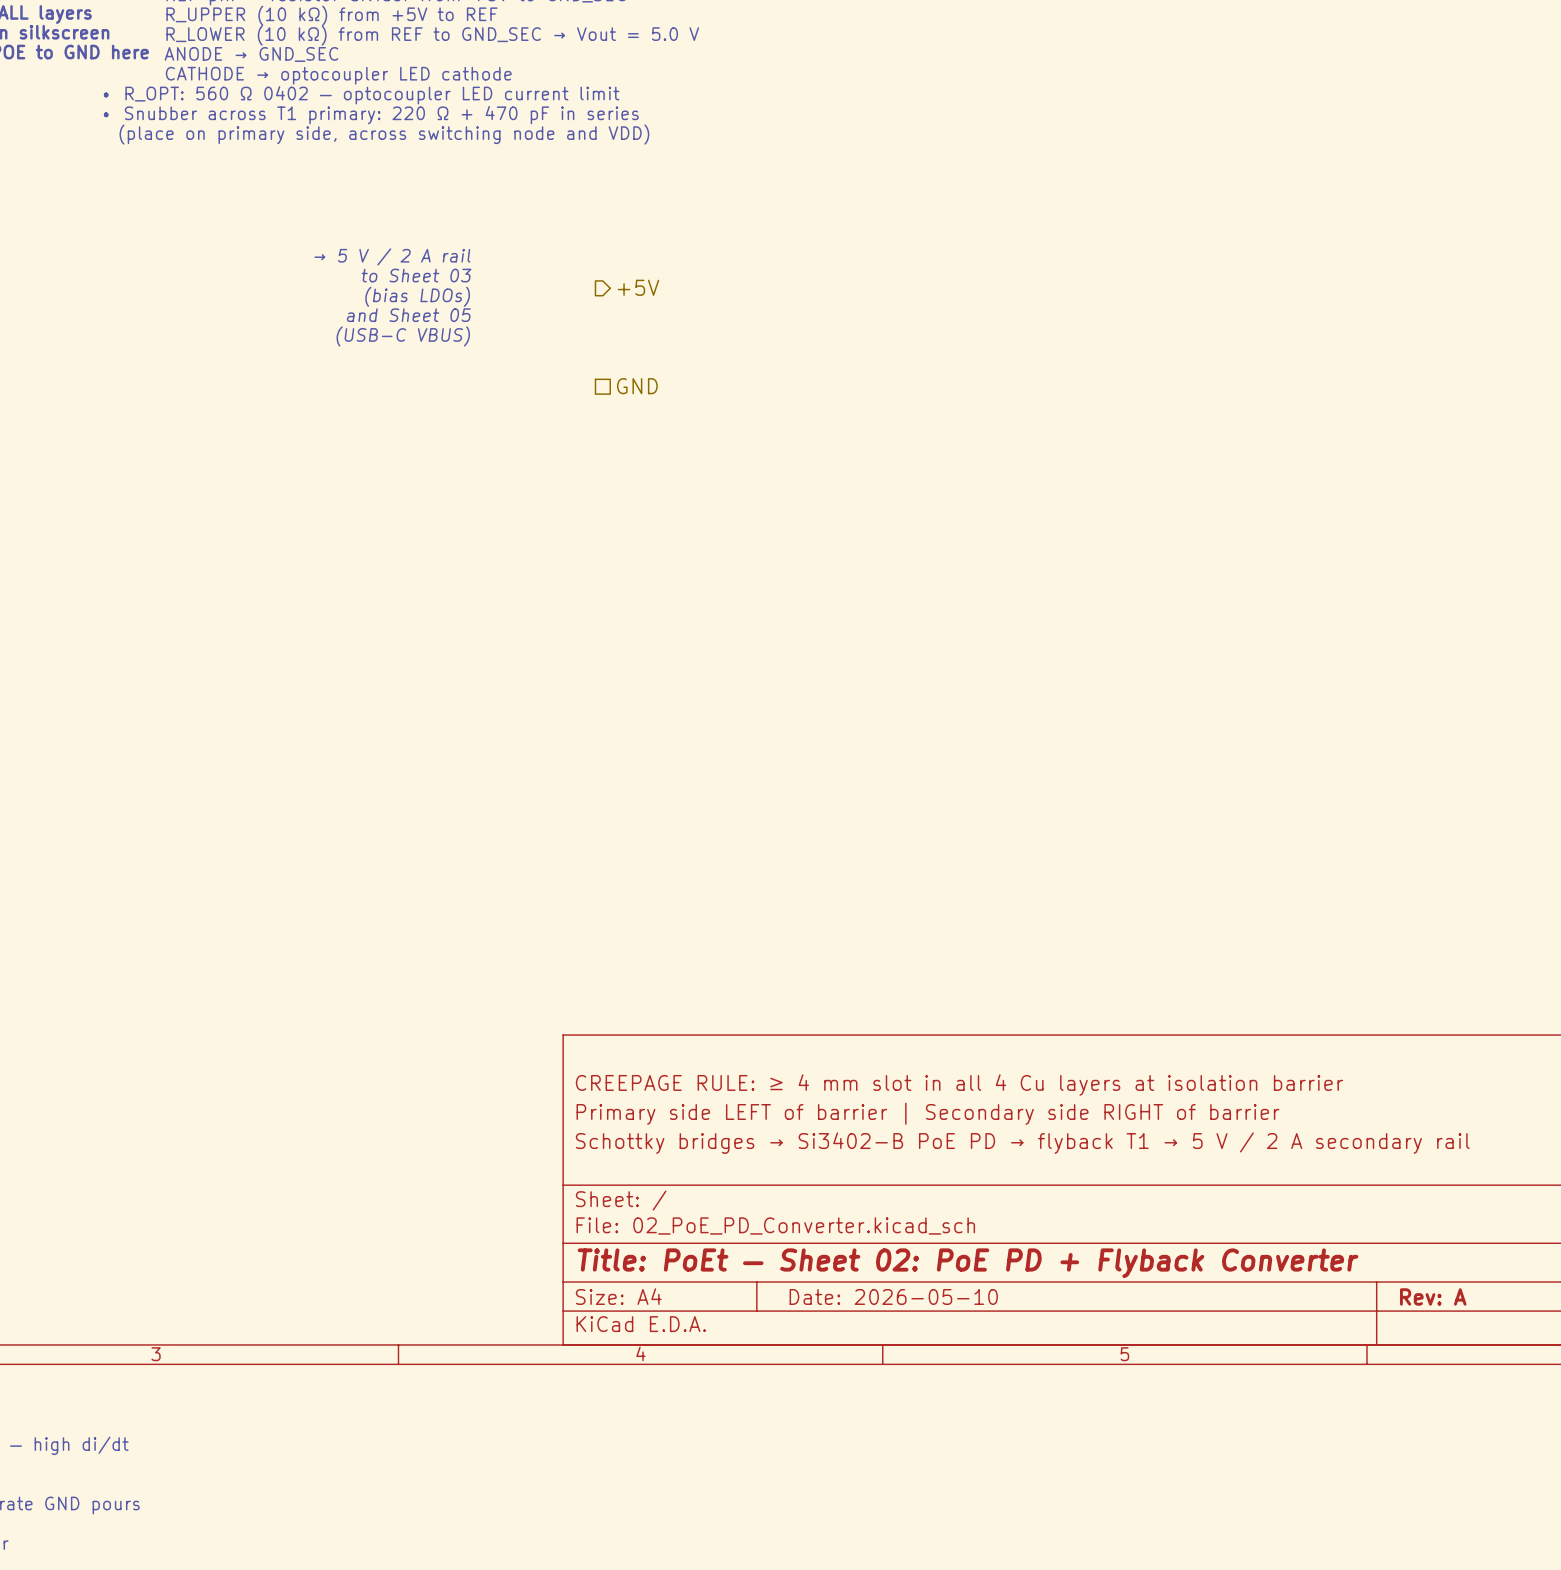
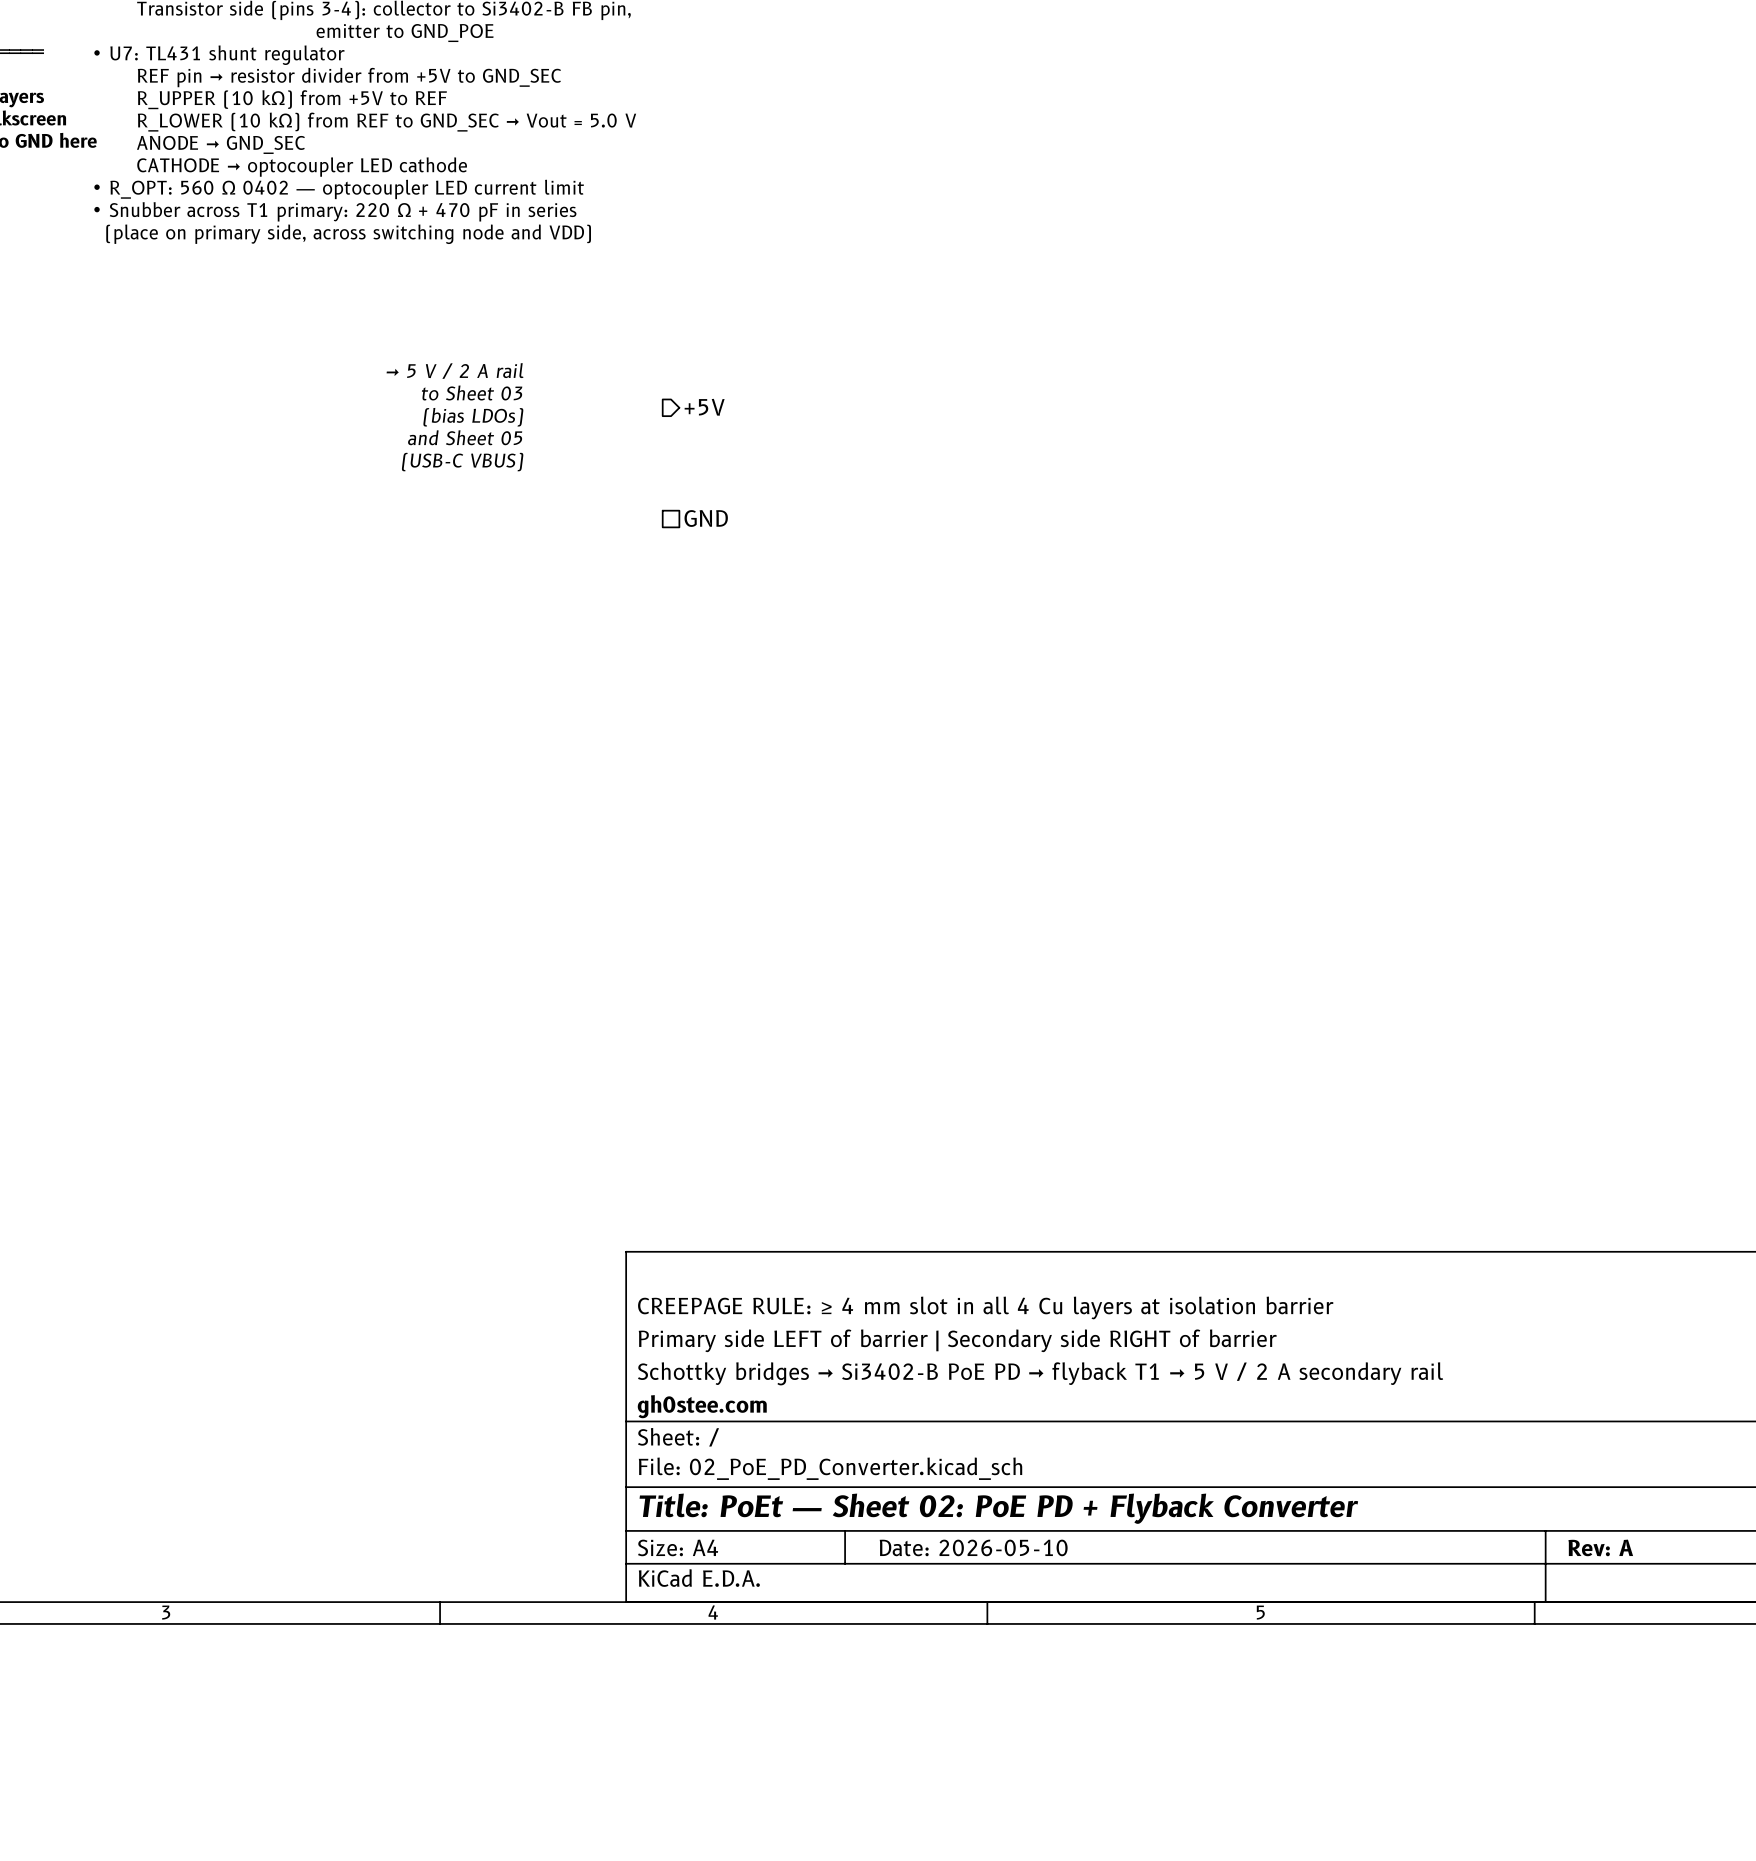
title block: none -> gh0stee.com (702, 1406)

